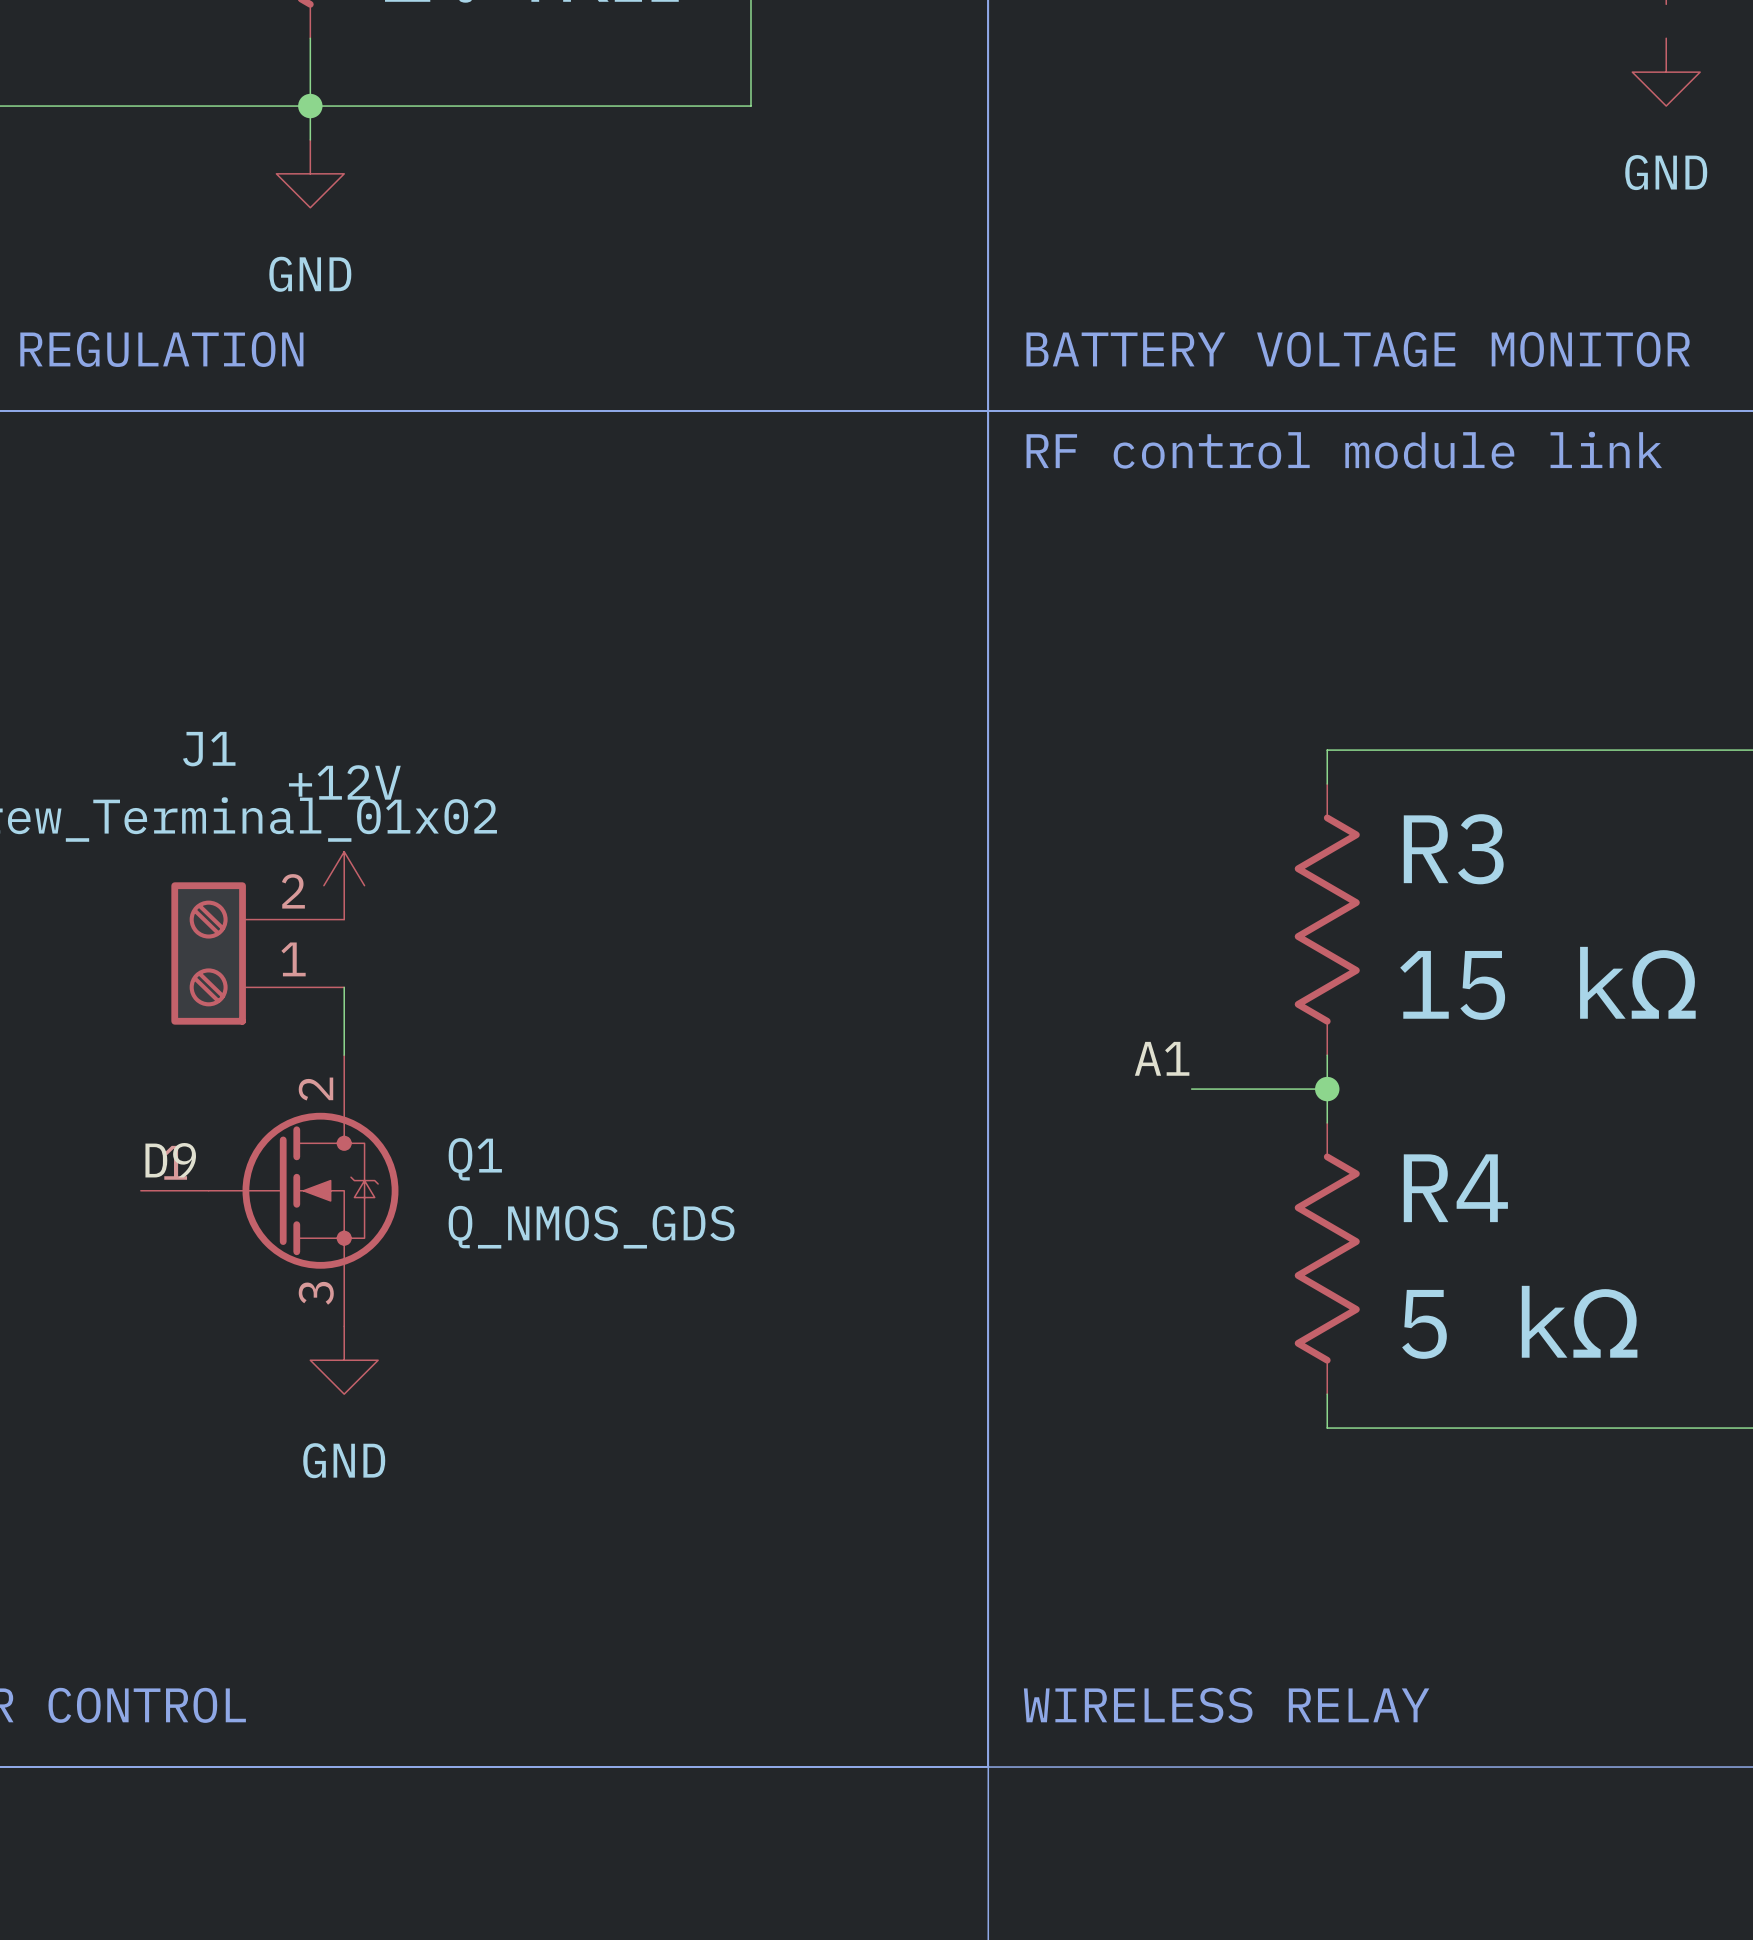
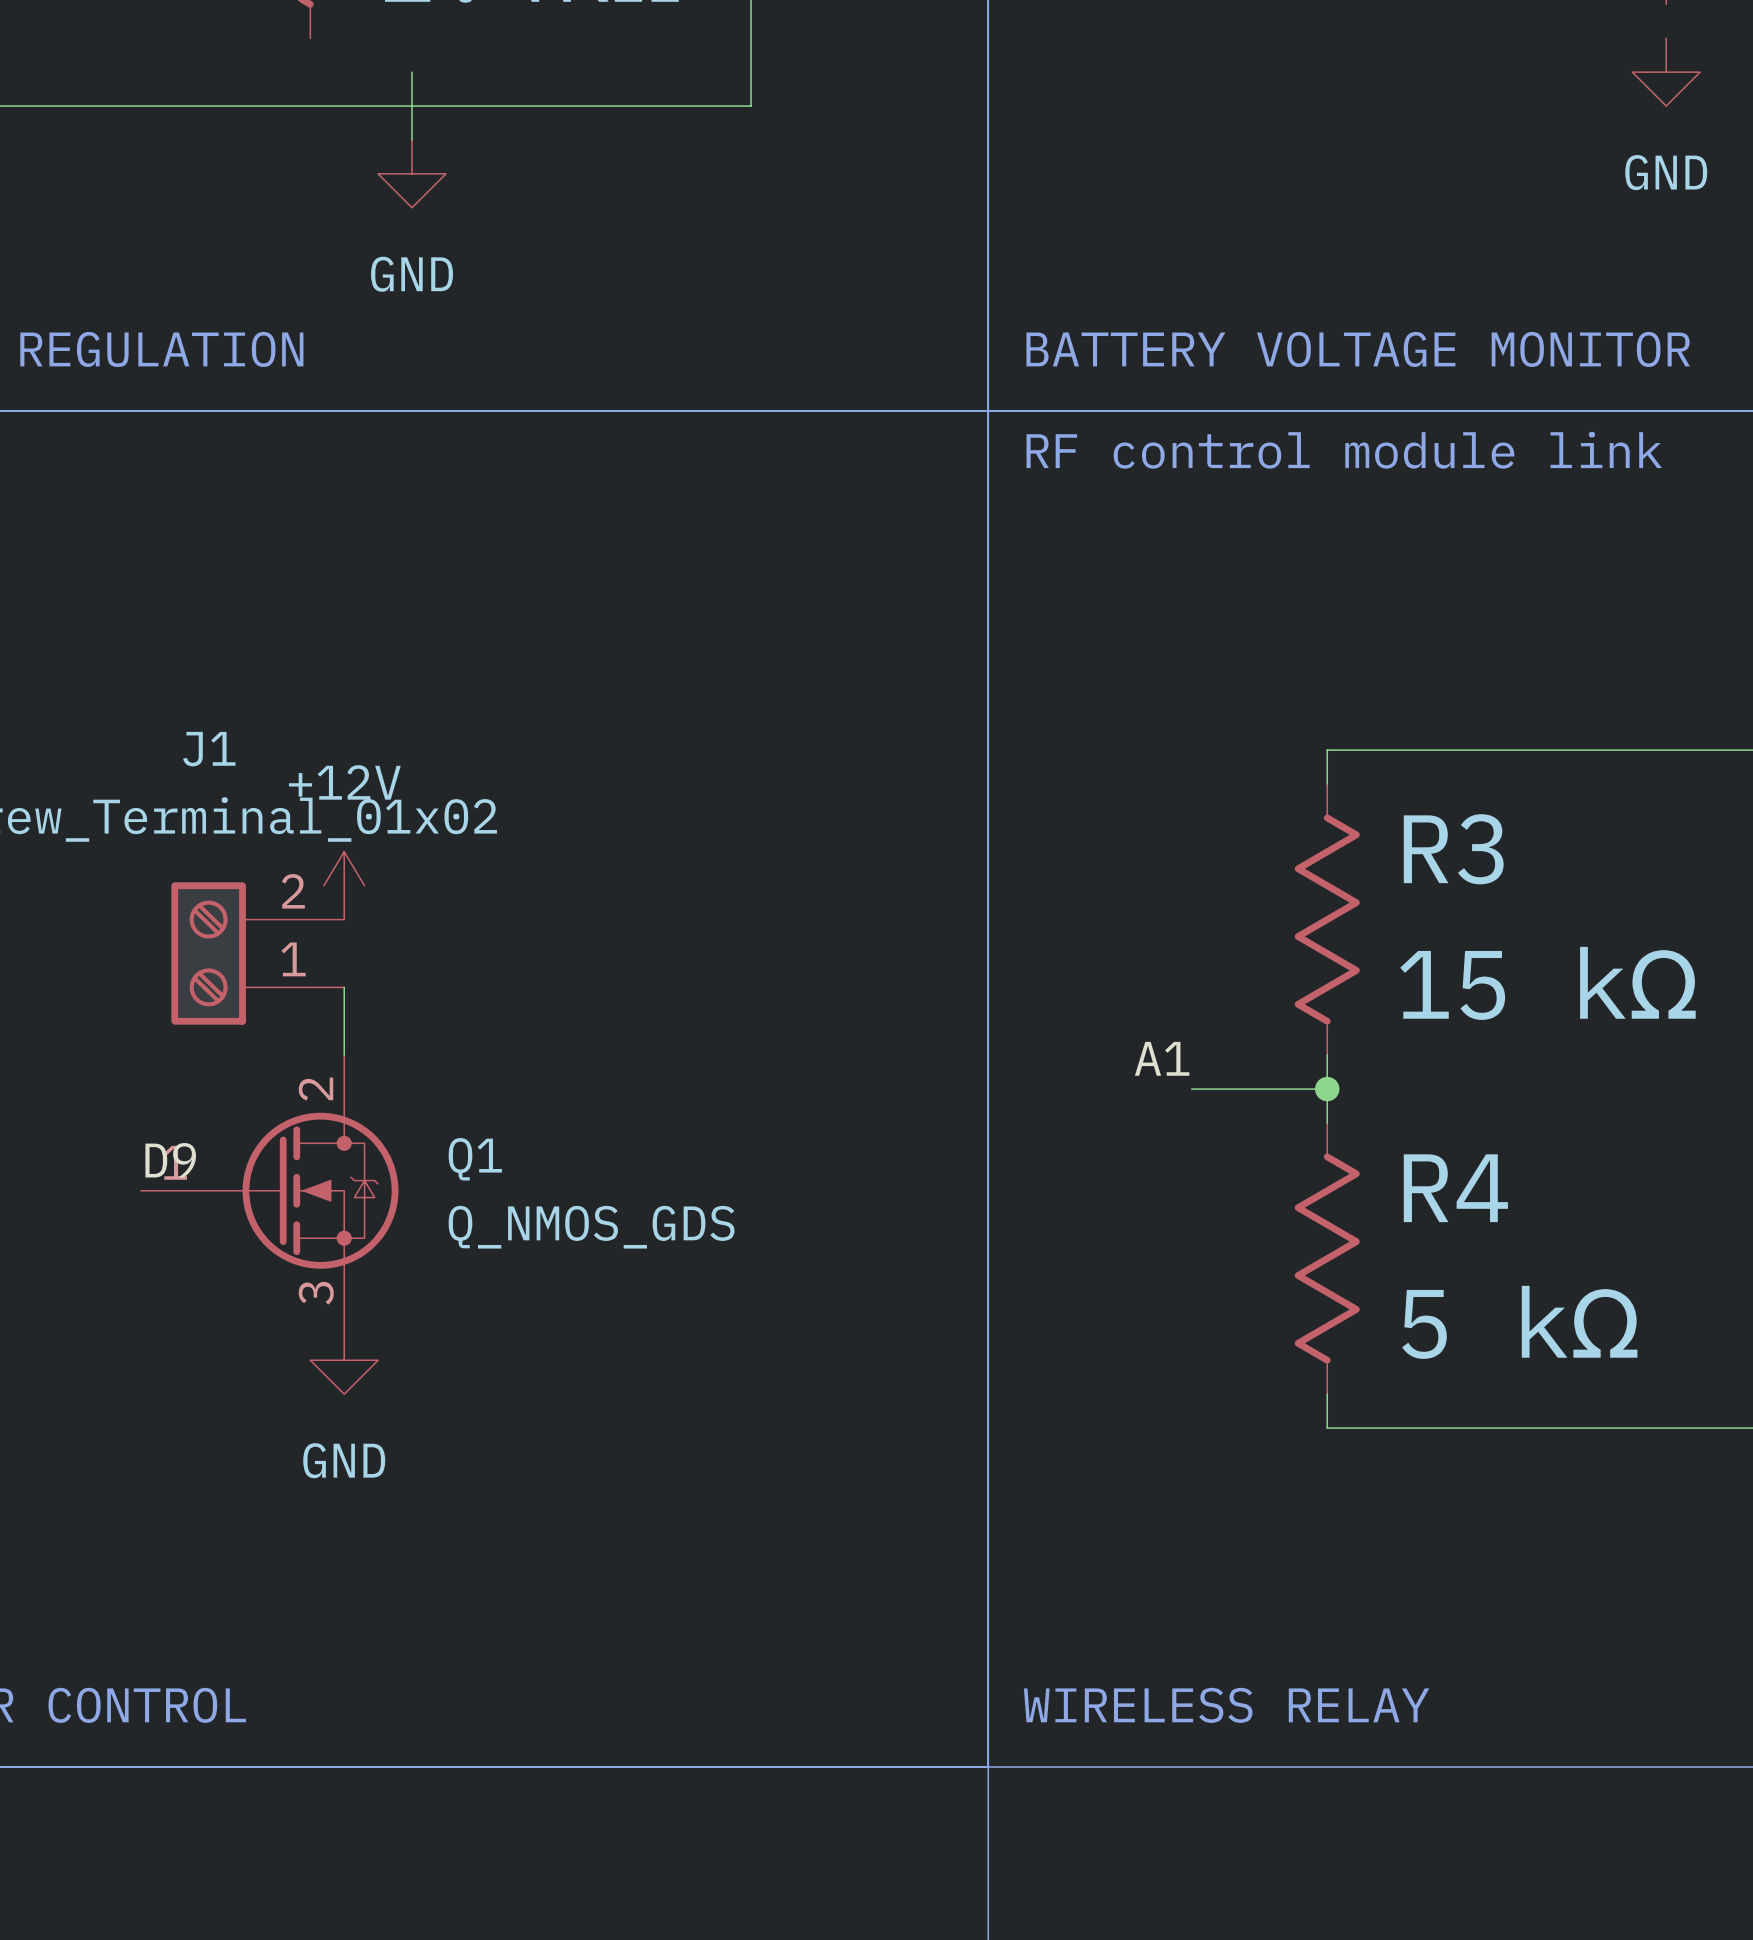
wire: (310, 38) (310, 139) -> none
wire: none -> (412, 72) (412, 139)
junction: (310, 106) -> none
power symbol position: GND (310, 173) -> GND (412, 173)

